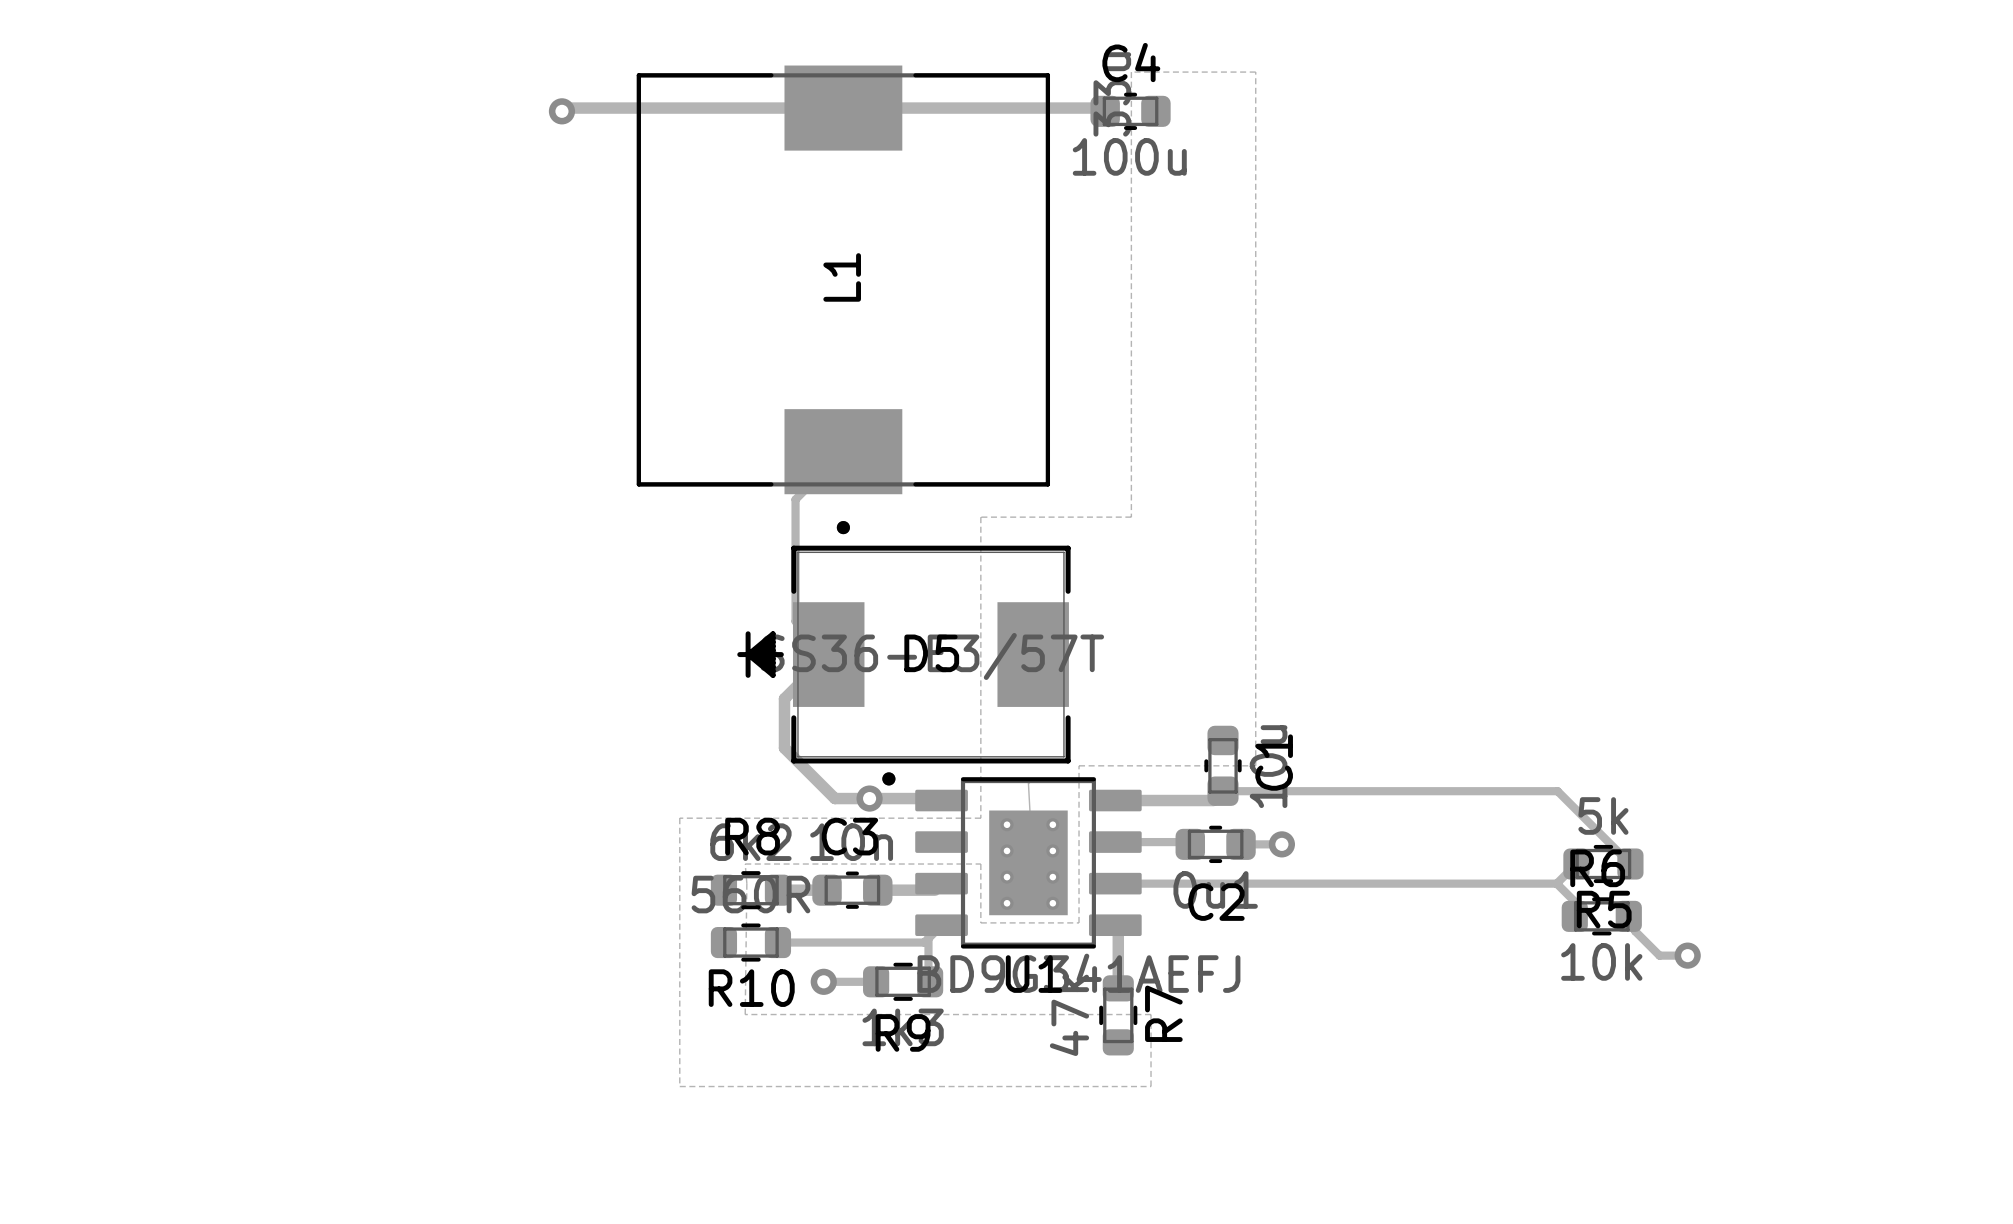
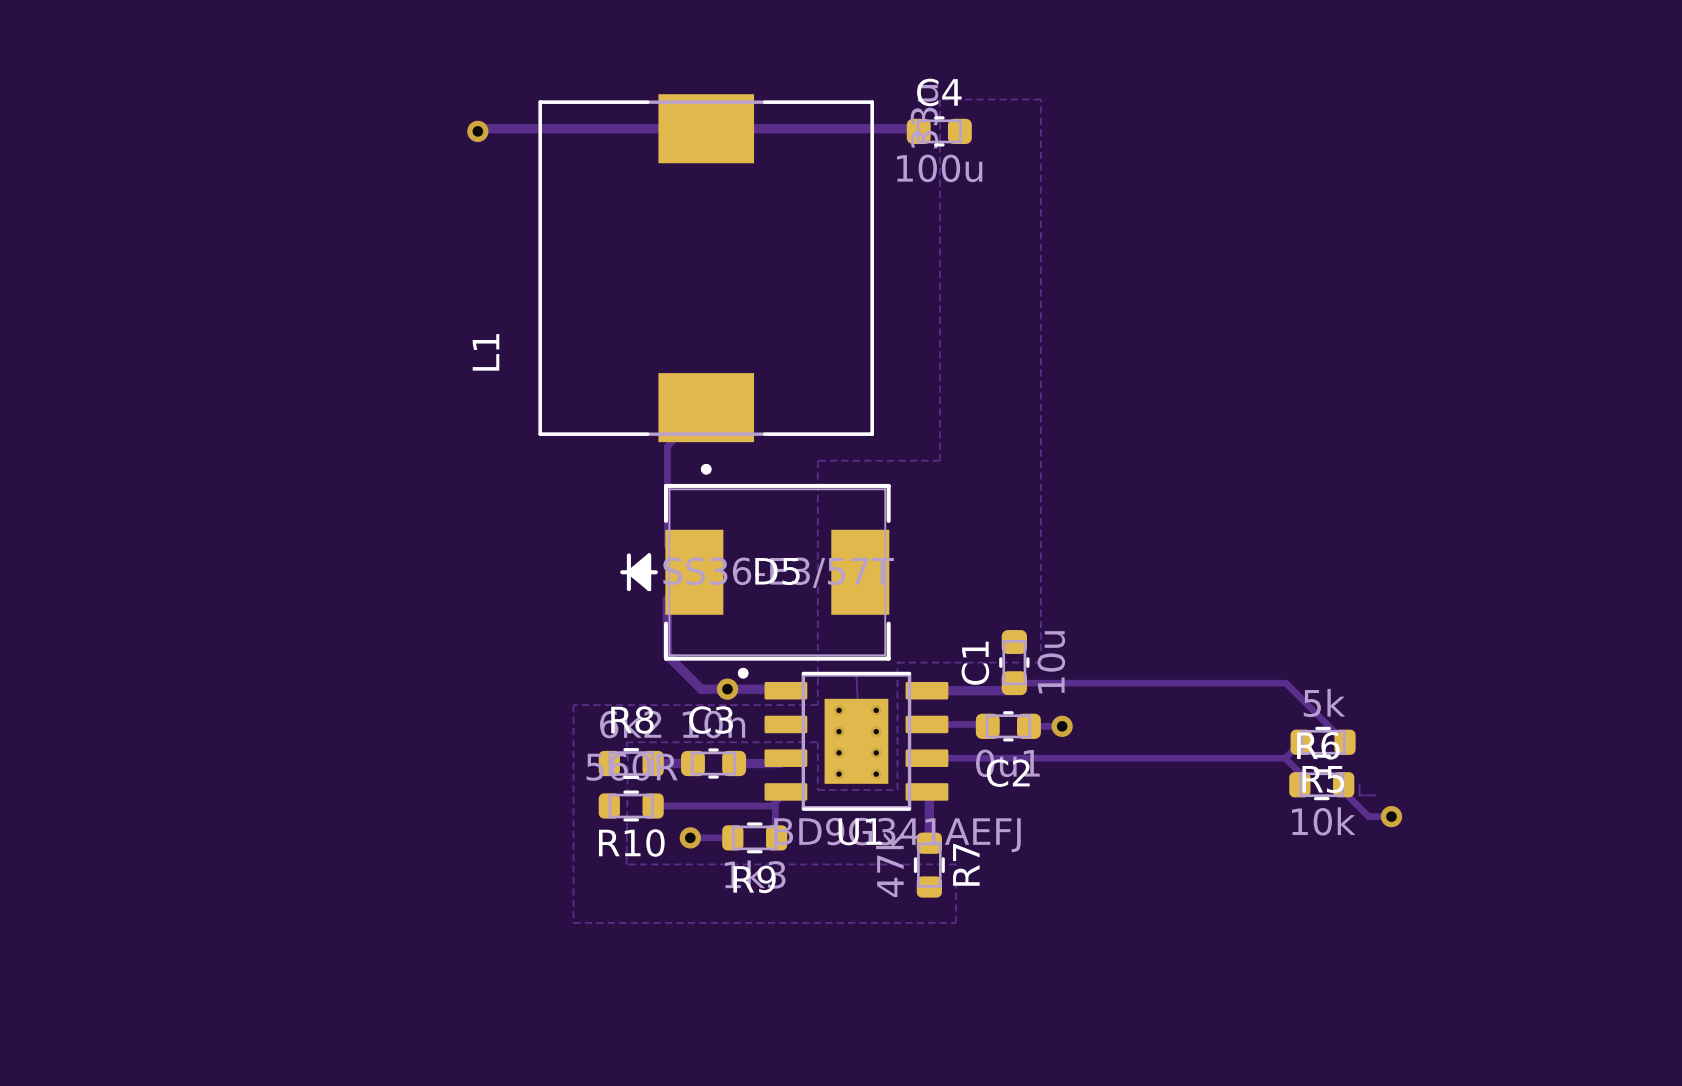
L1 name position: L1 (842, 277) -> L1 (486, 352)
track: (828, 654) (784, 698) (784, 748) (834, 798) (837, 798) -> (667, 599) (667, 655) (701, 689)
C1 name position: C1 (1274, 762) -> C1 (975, 663)
track: none -> (1359, 784) (1359, 795) (1375, 795)

